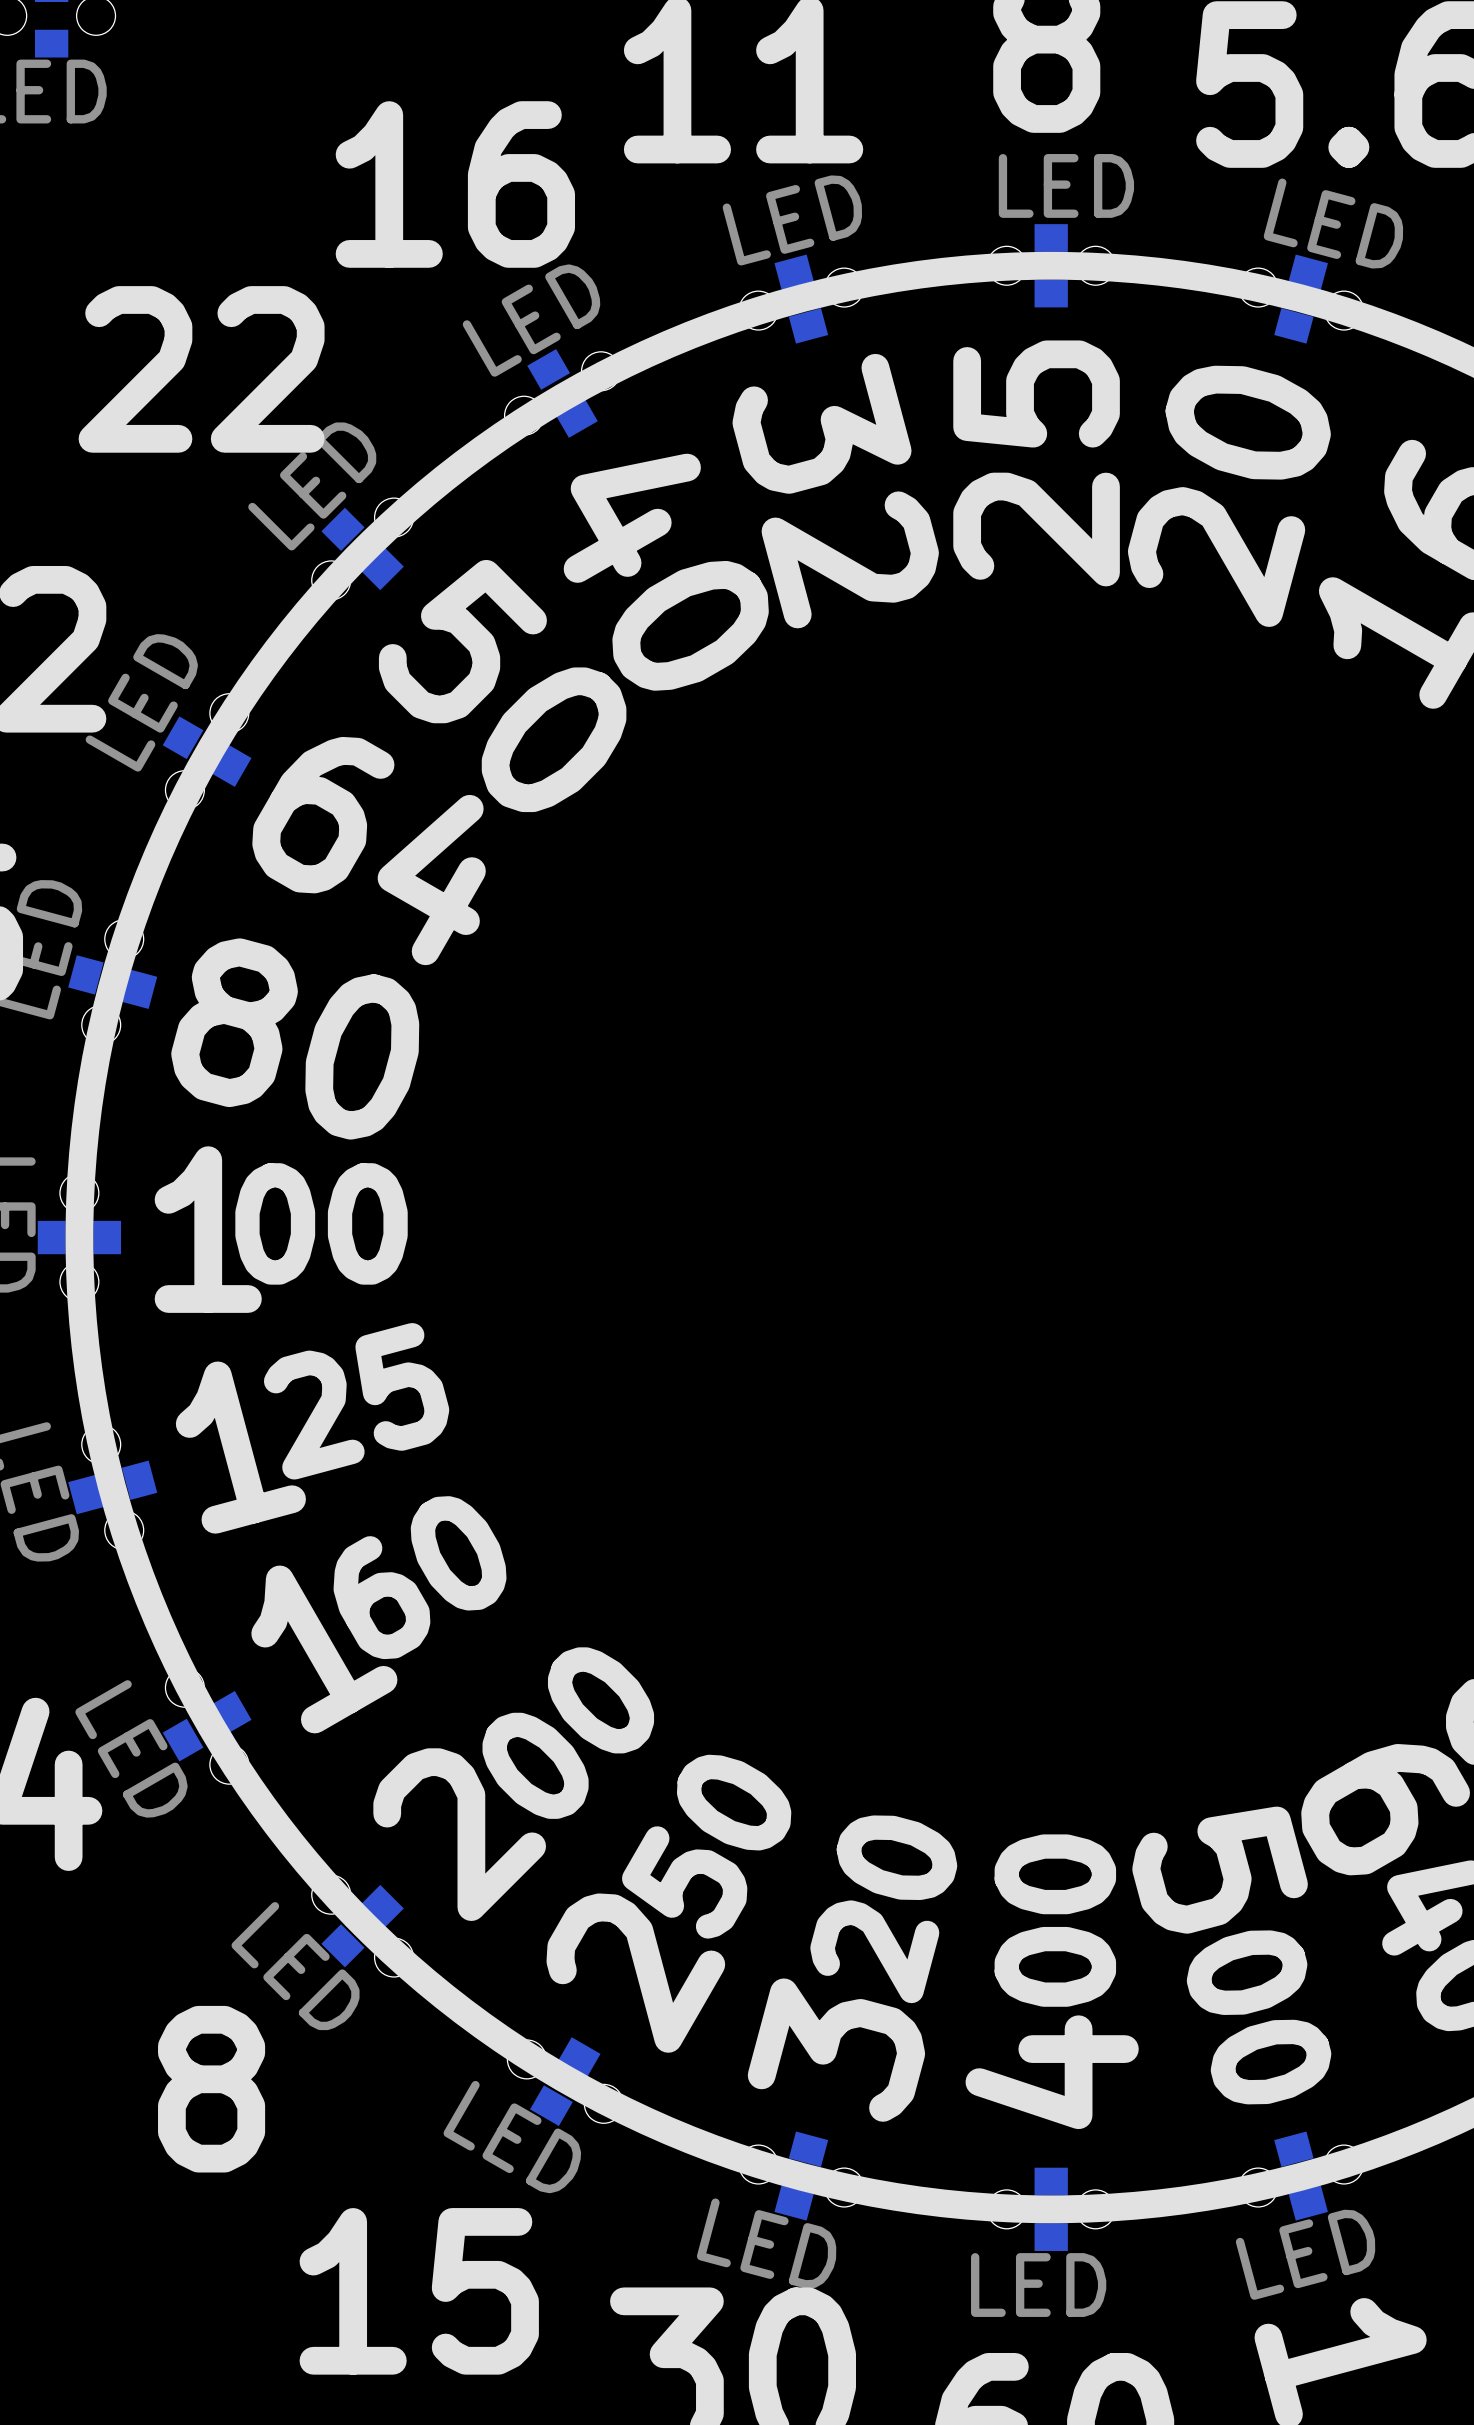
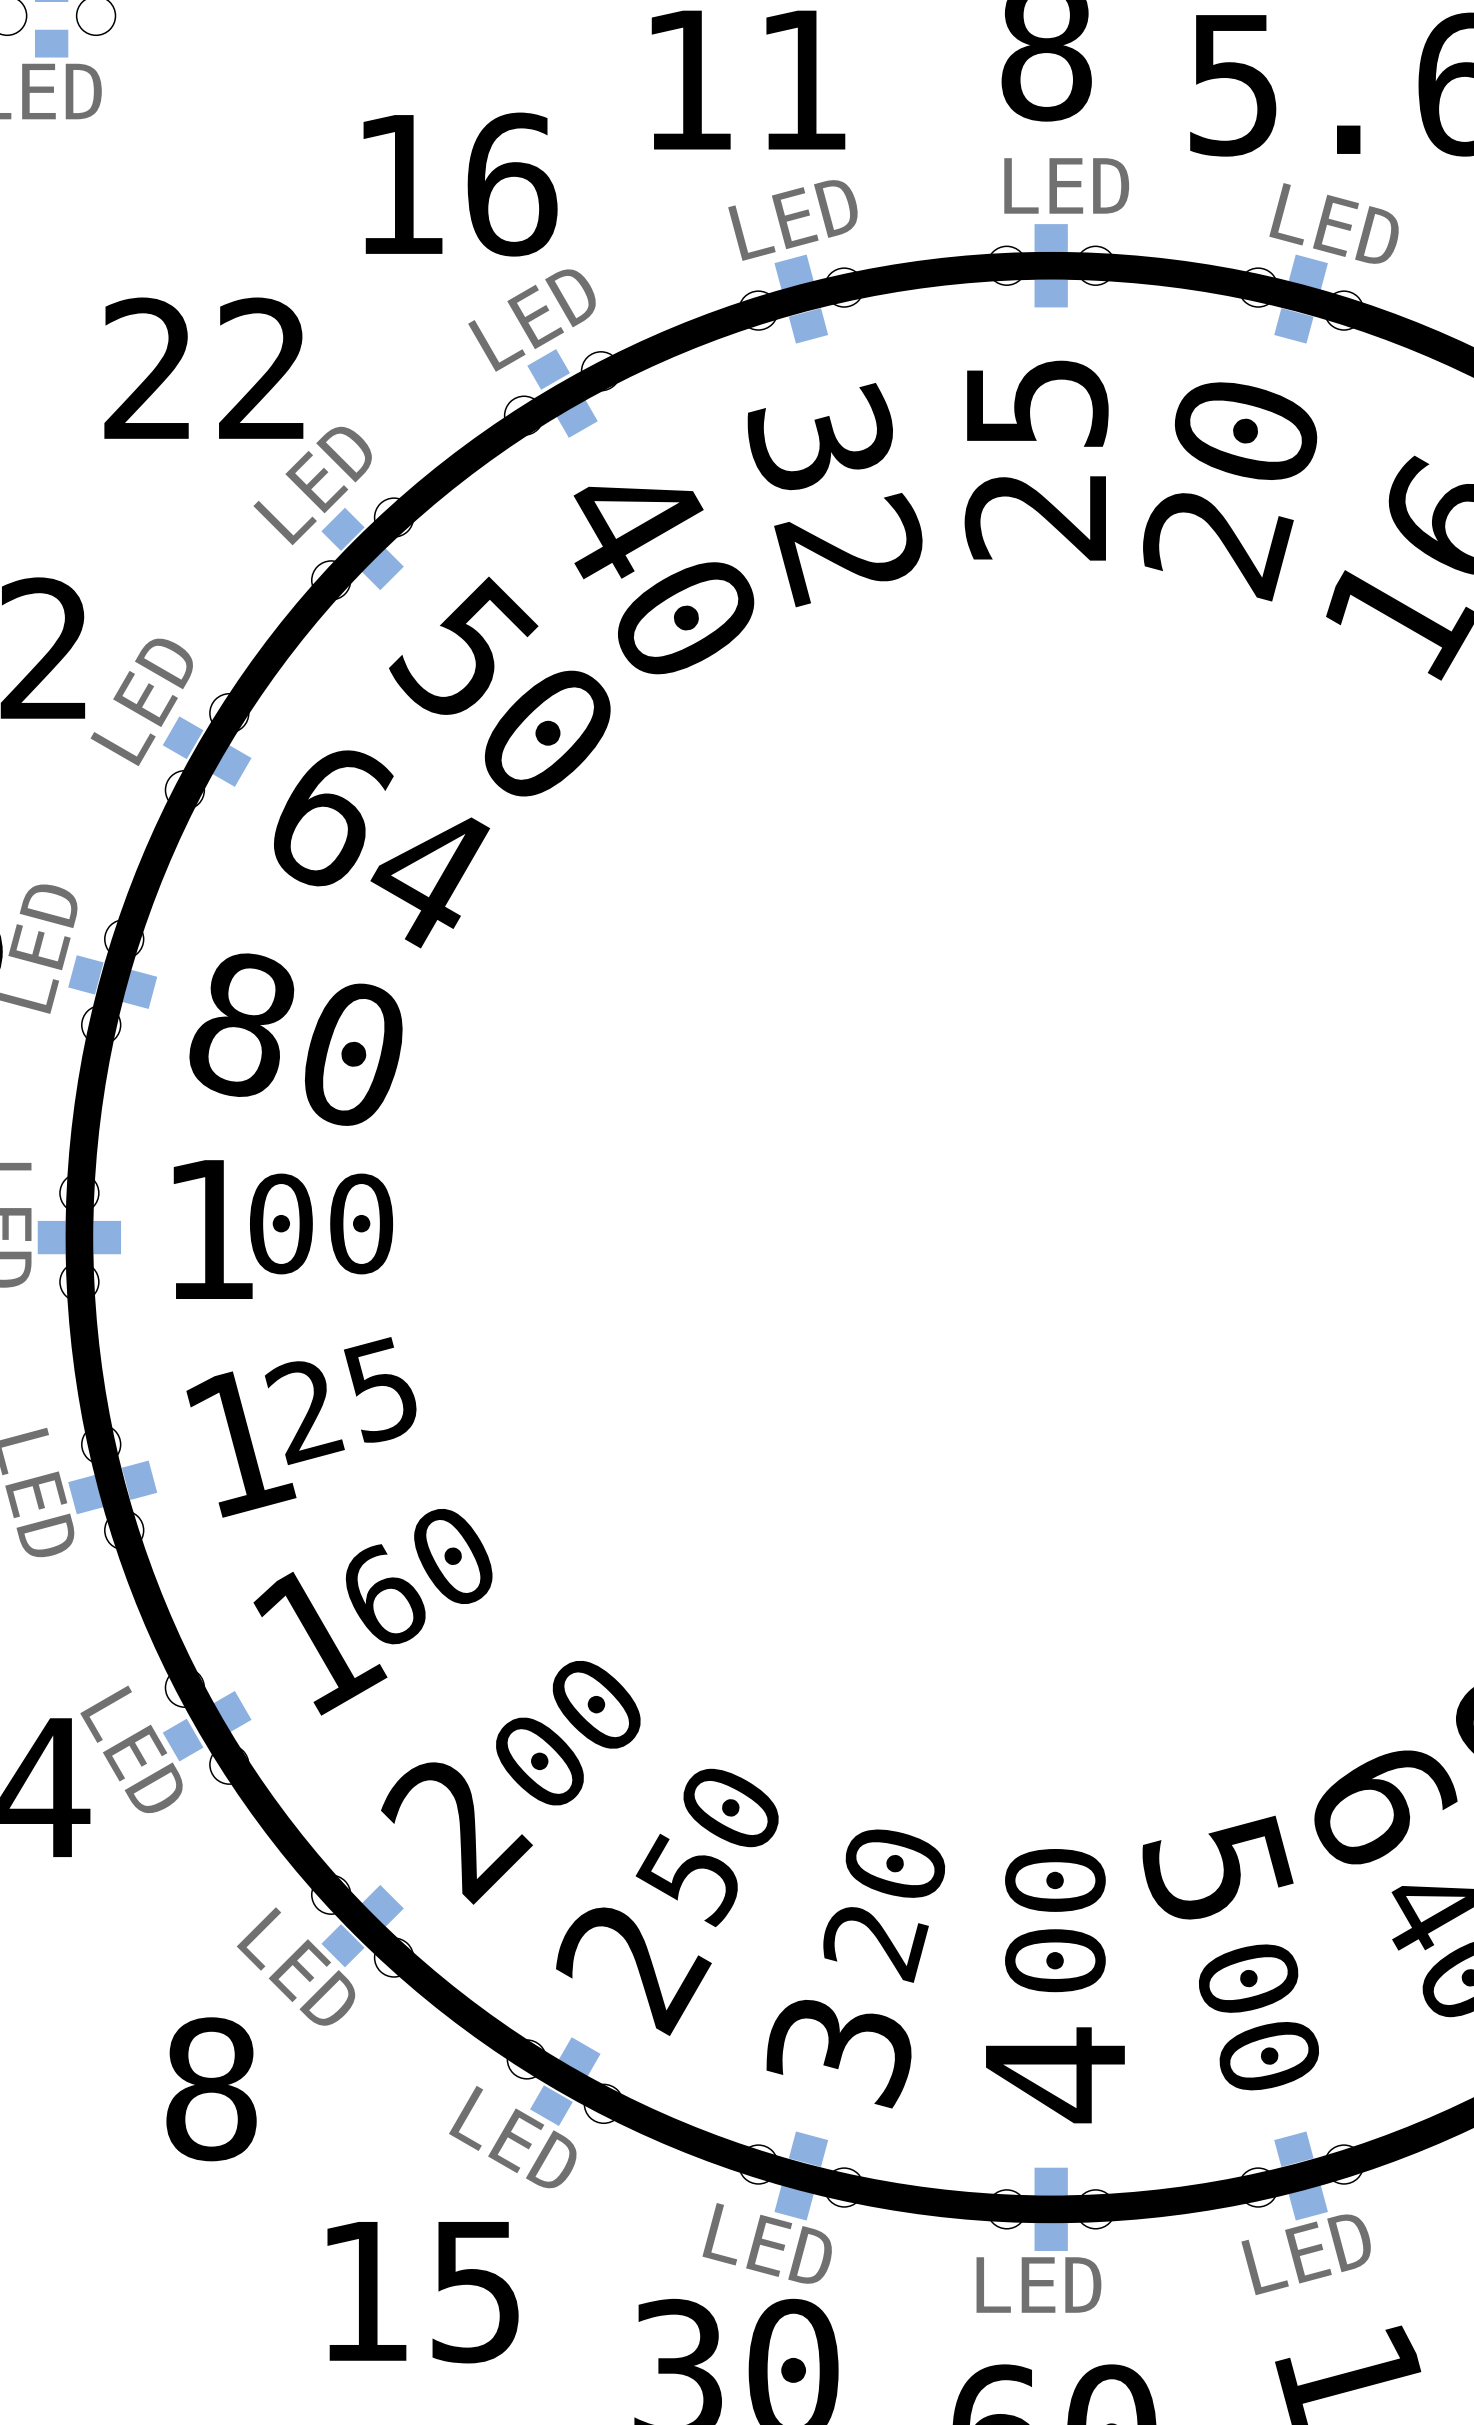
text position: 25 (356, 1401) -> 25 (341, 1401)

